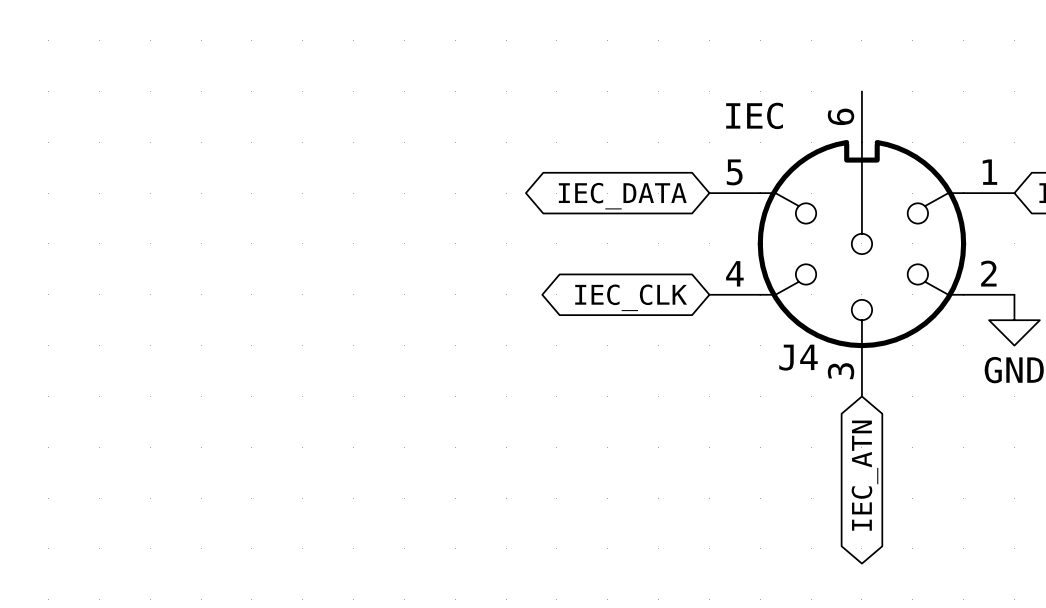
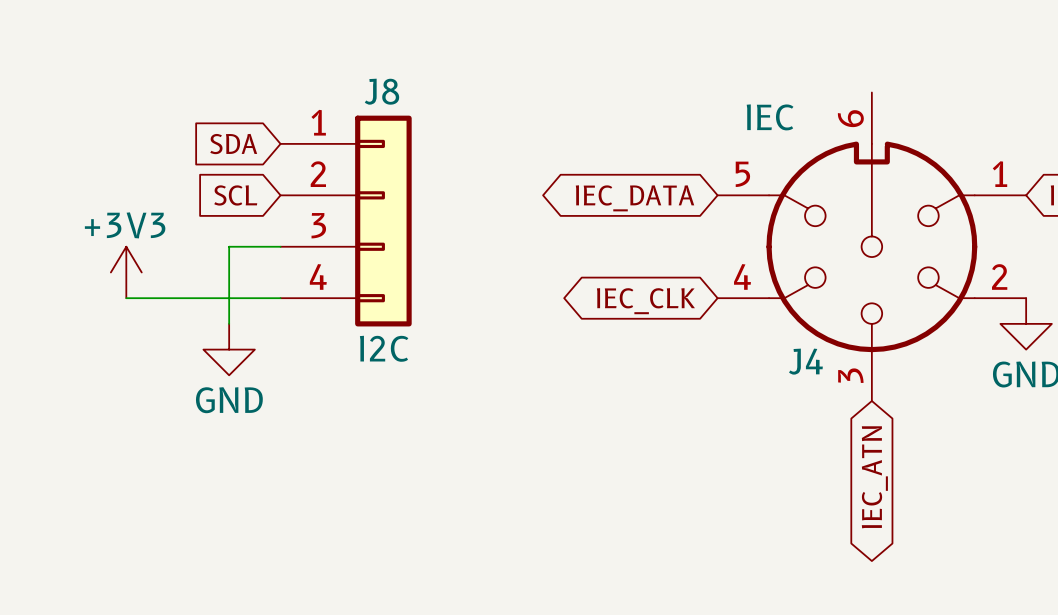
global label: none -> SDA (233, 144)
global label: none -> SCL (235, 195)
J8: none -> I2C (346, 221)
wire: none -> (280, 246) (229, 246) (229, 323)
power symbol: none -> +3V3 (126, 272)
wire: none -> (126, 298) (280, 298)
power symbol: none -> GND (229, 349)

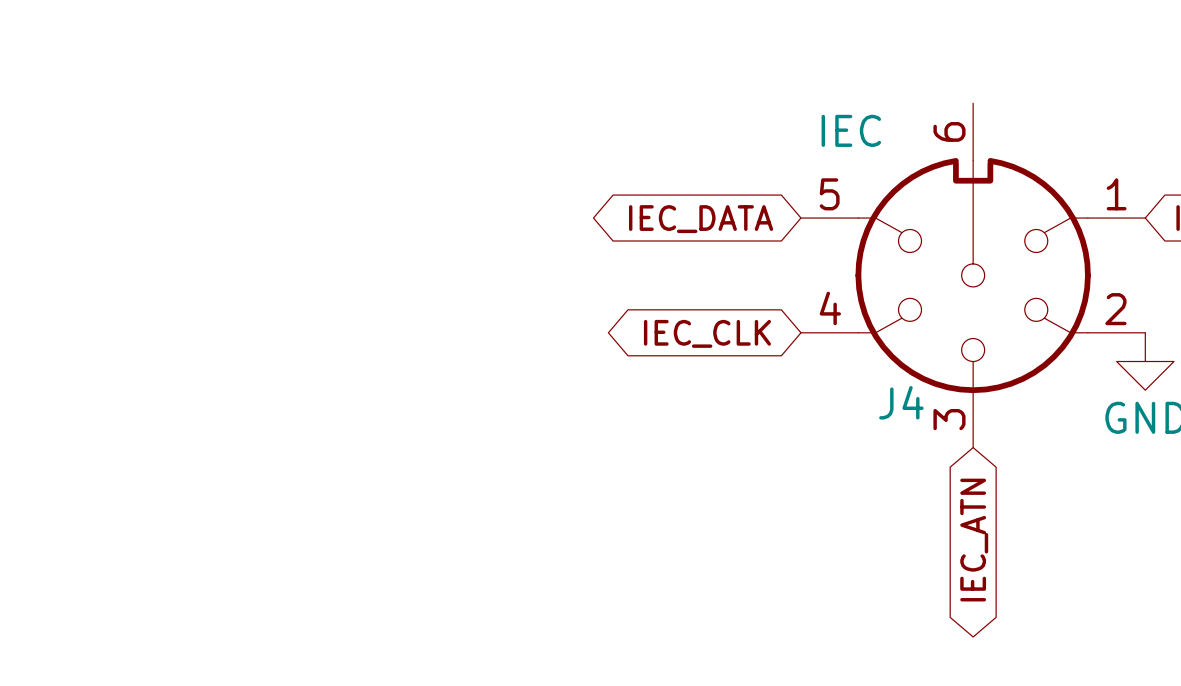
global label: SDA (233, 144) -> none
global label: SCL (235, 195) -> none
J8: I2C (346, 221) -> none
wire: (280, 246) (229, 246) (229, 323) -> none
power symbol: +3V3 (126, 272) -> none
wire: (126, 298) (280, 298) -> none
power symbol: GND (229, 349) -> none

